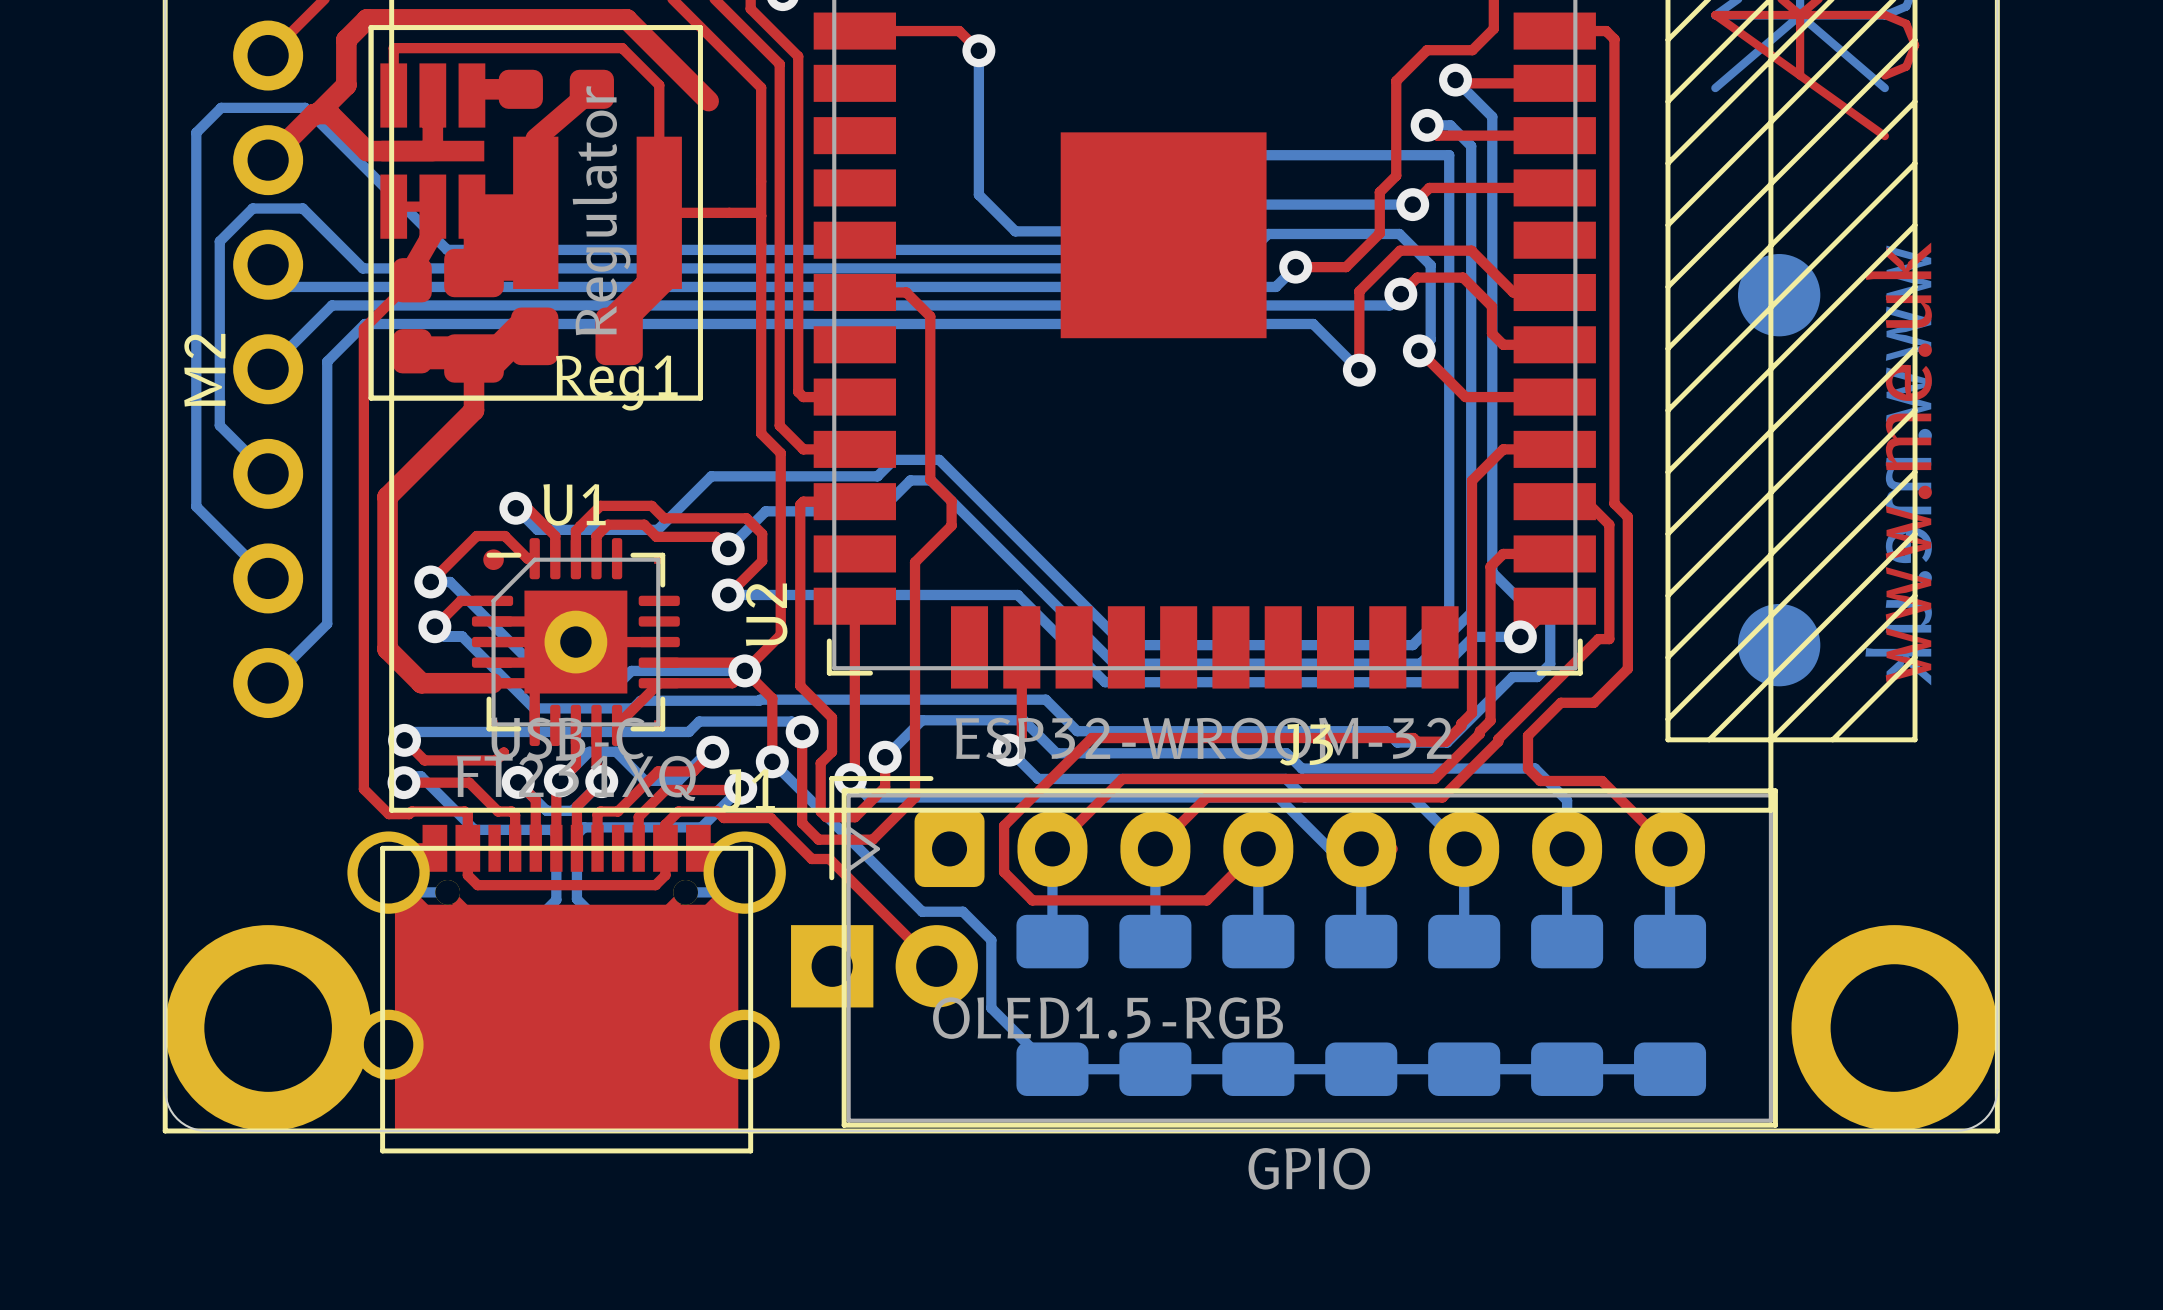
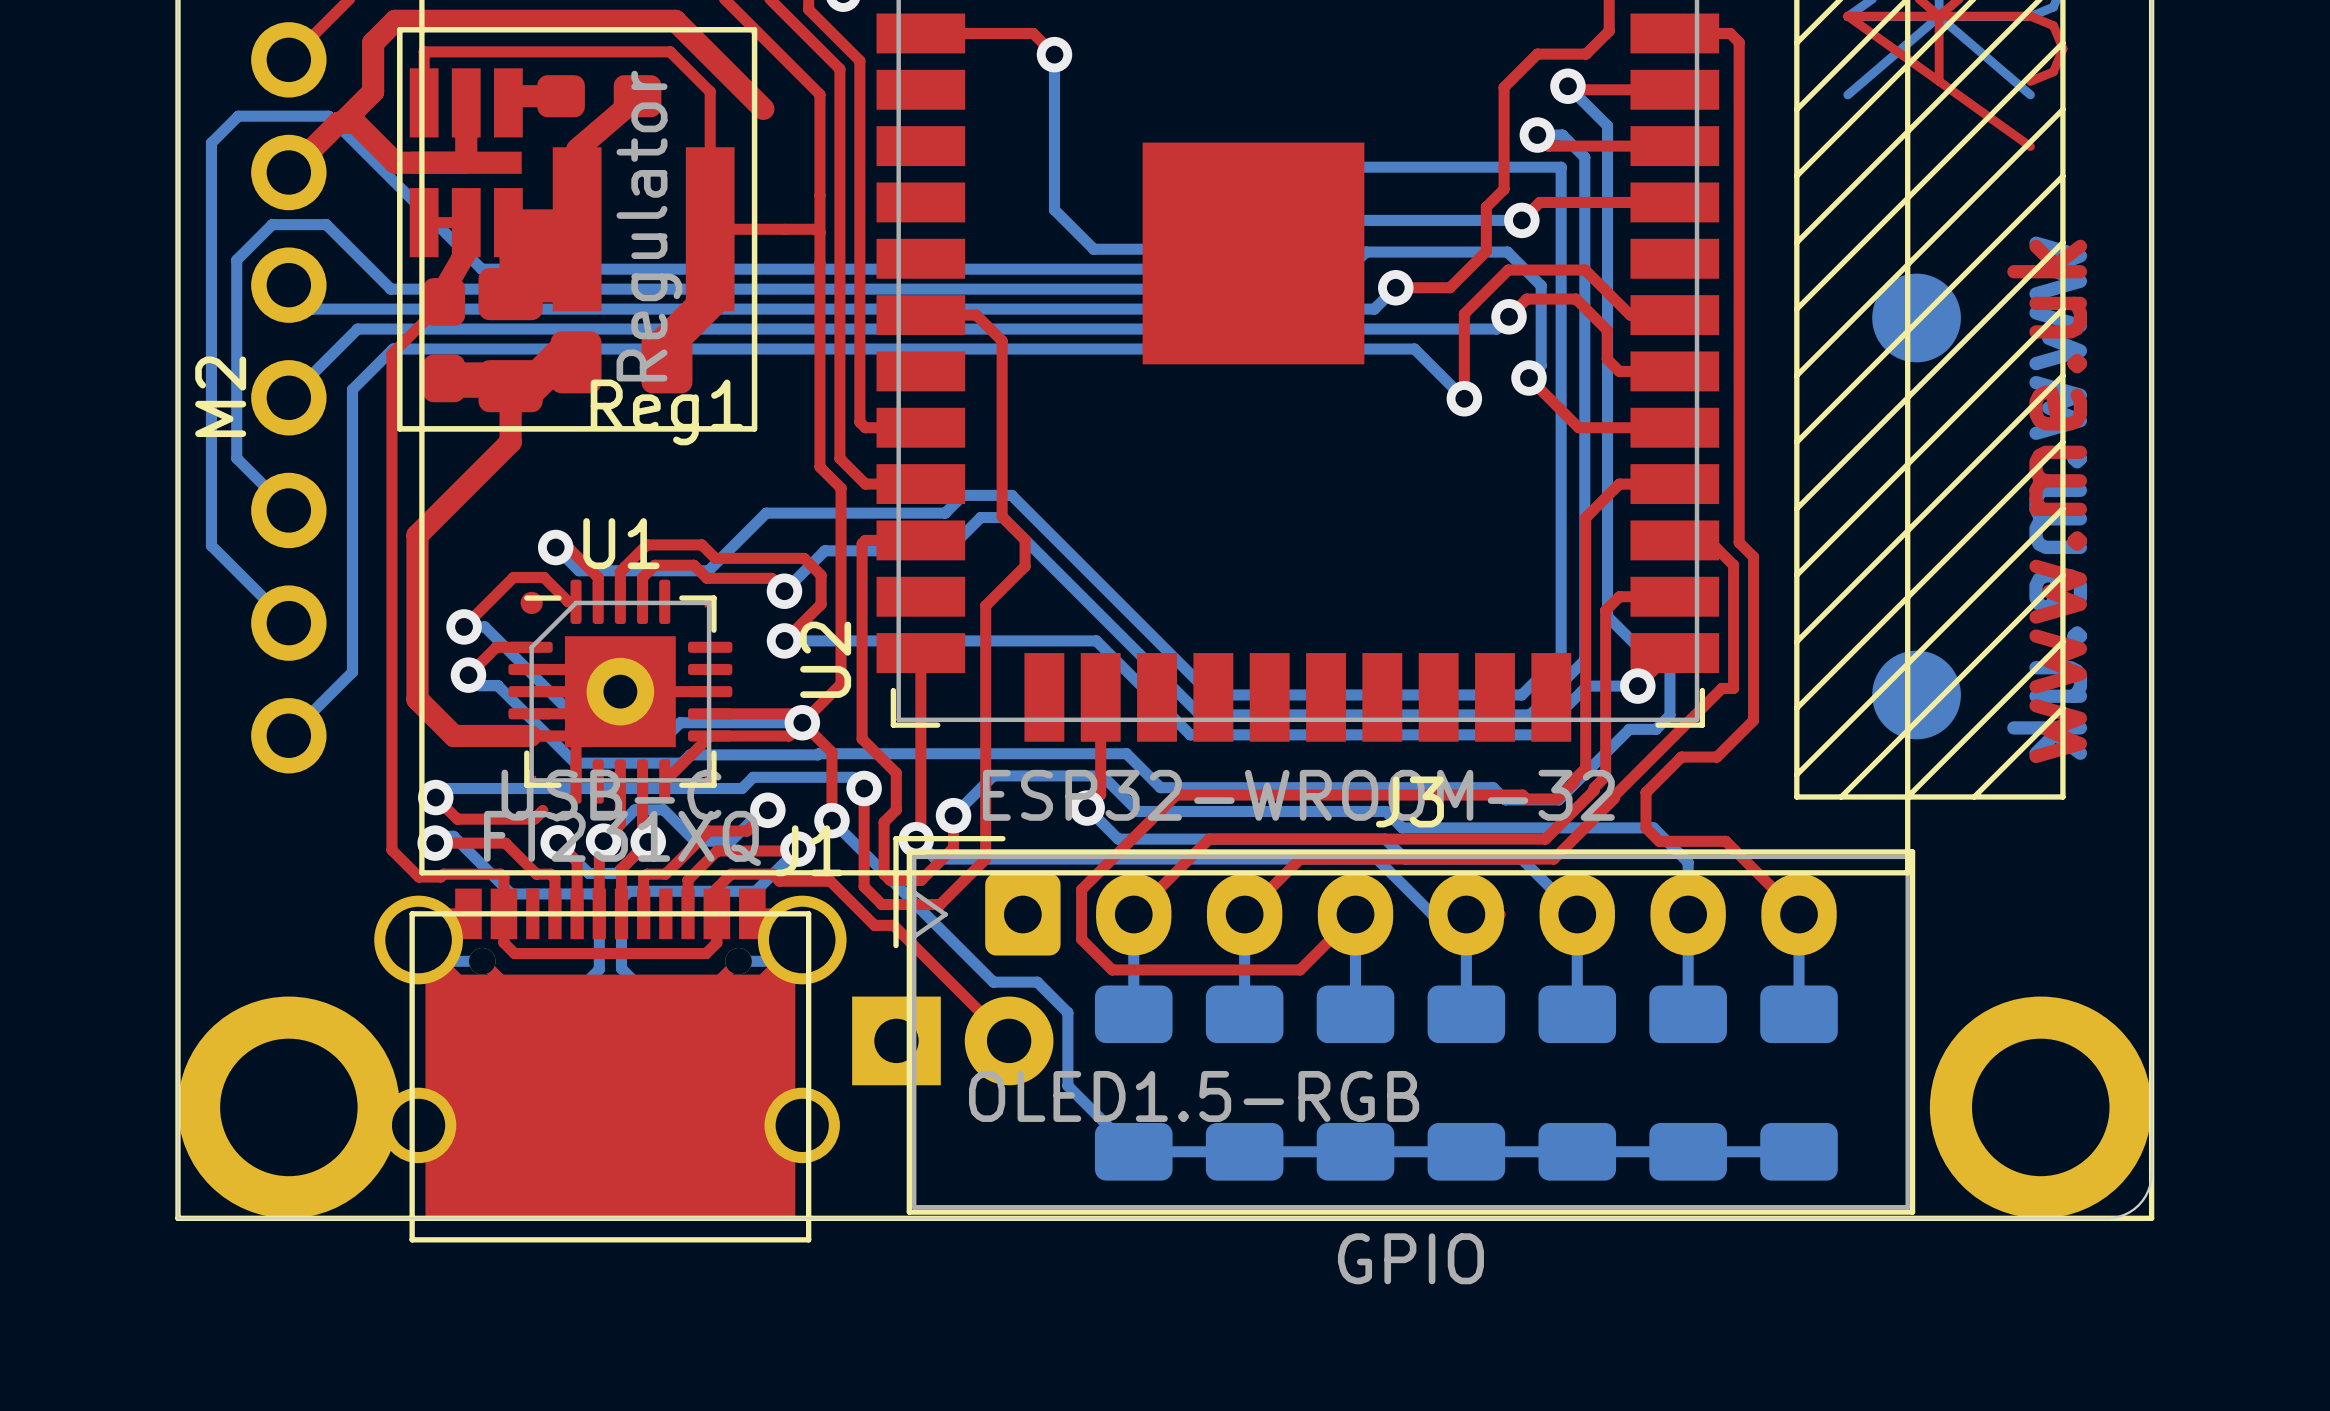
board edge: (165, 1089) (168, 1105) (177, 1118) (190, 1127) (206, 1130) -> (177, 1173) (177, 1218) (222, 1218)

